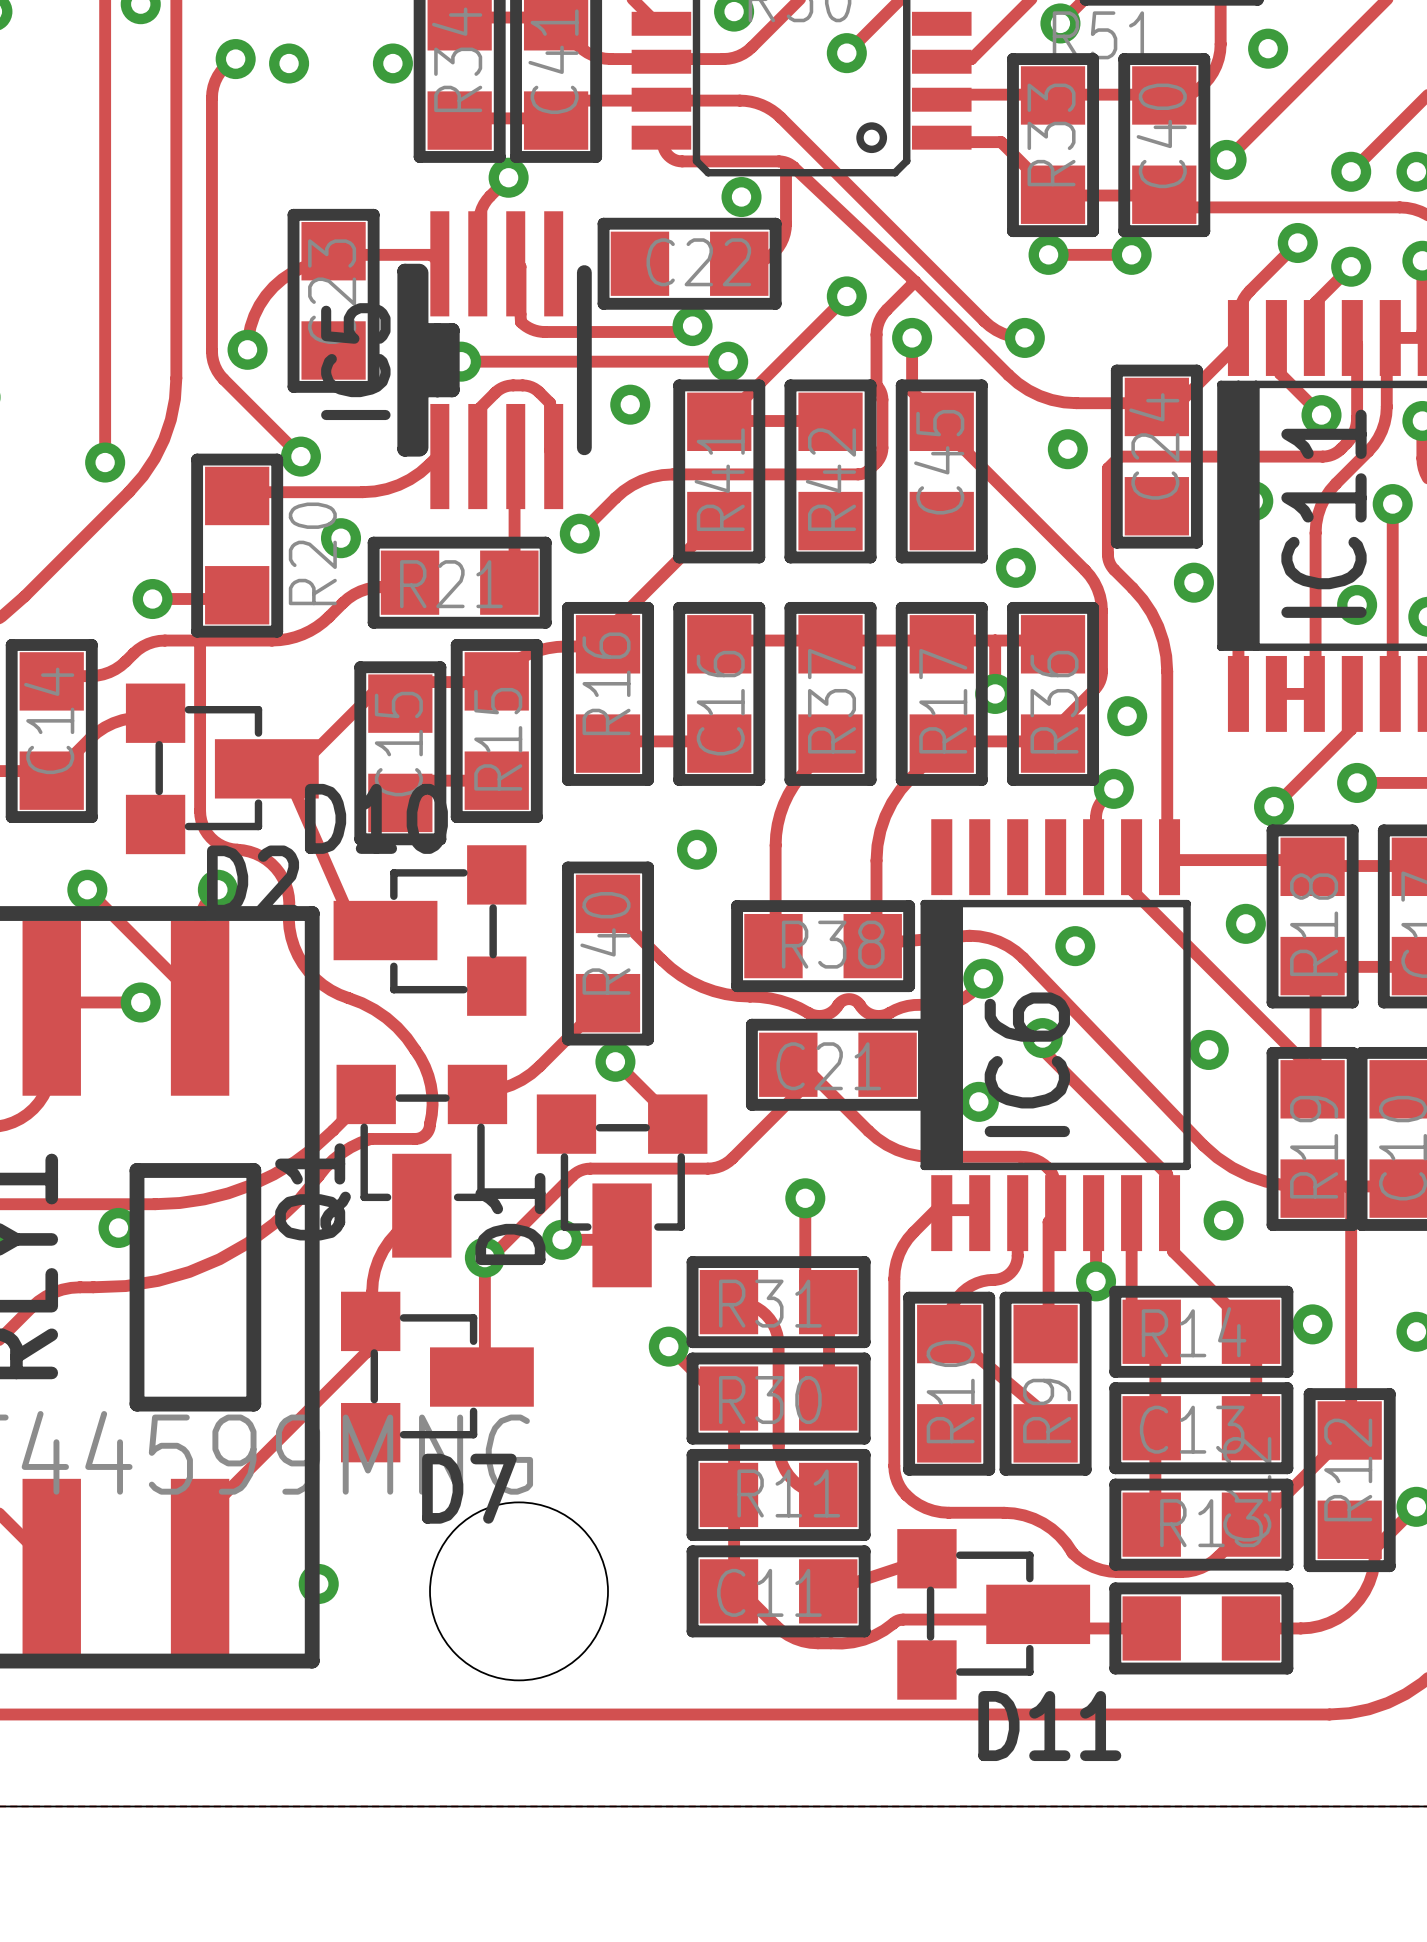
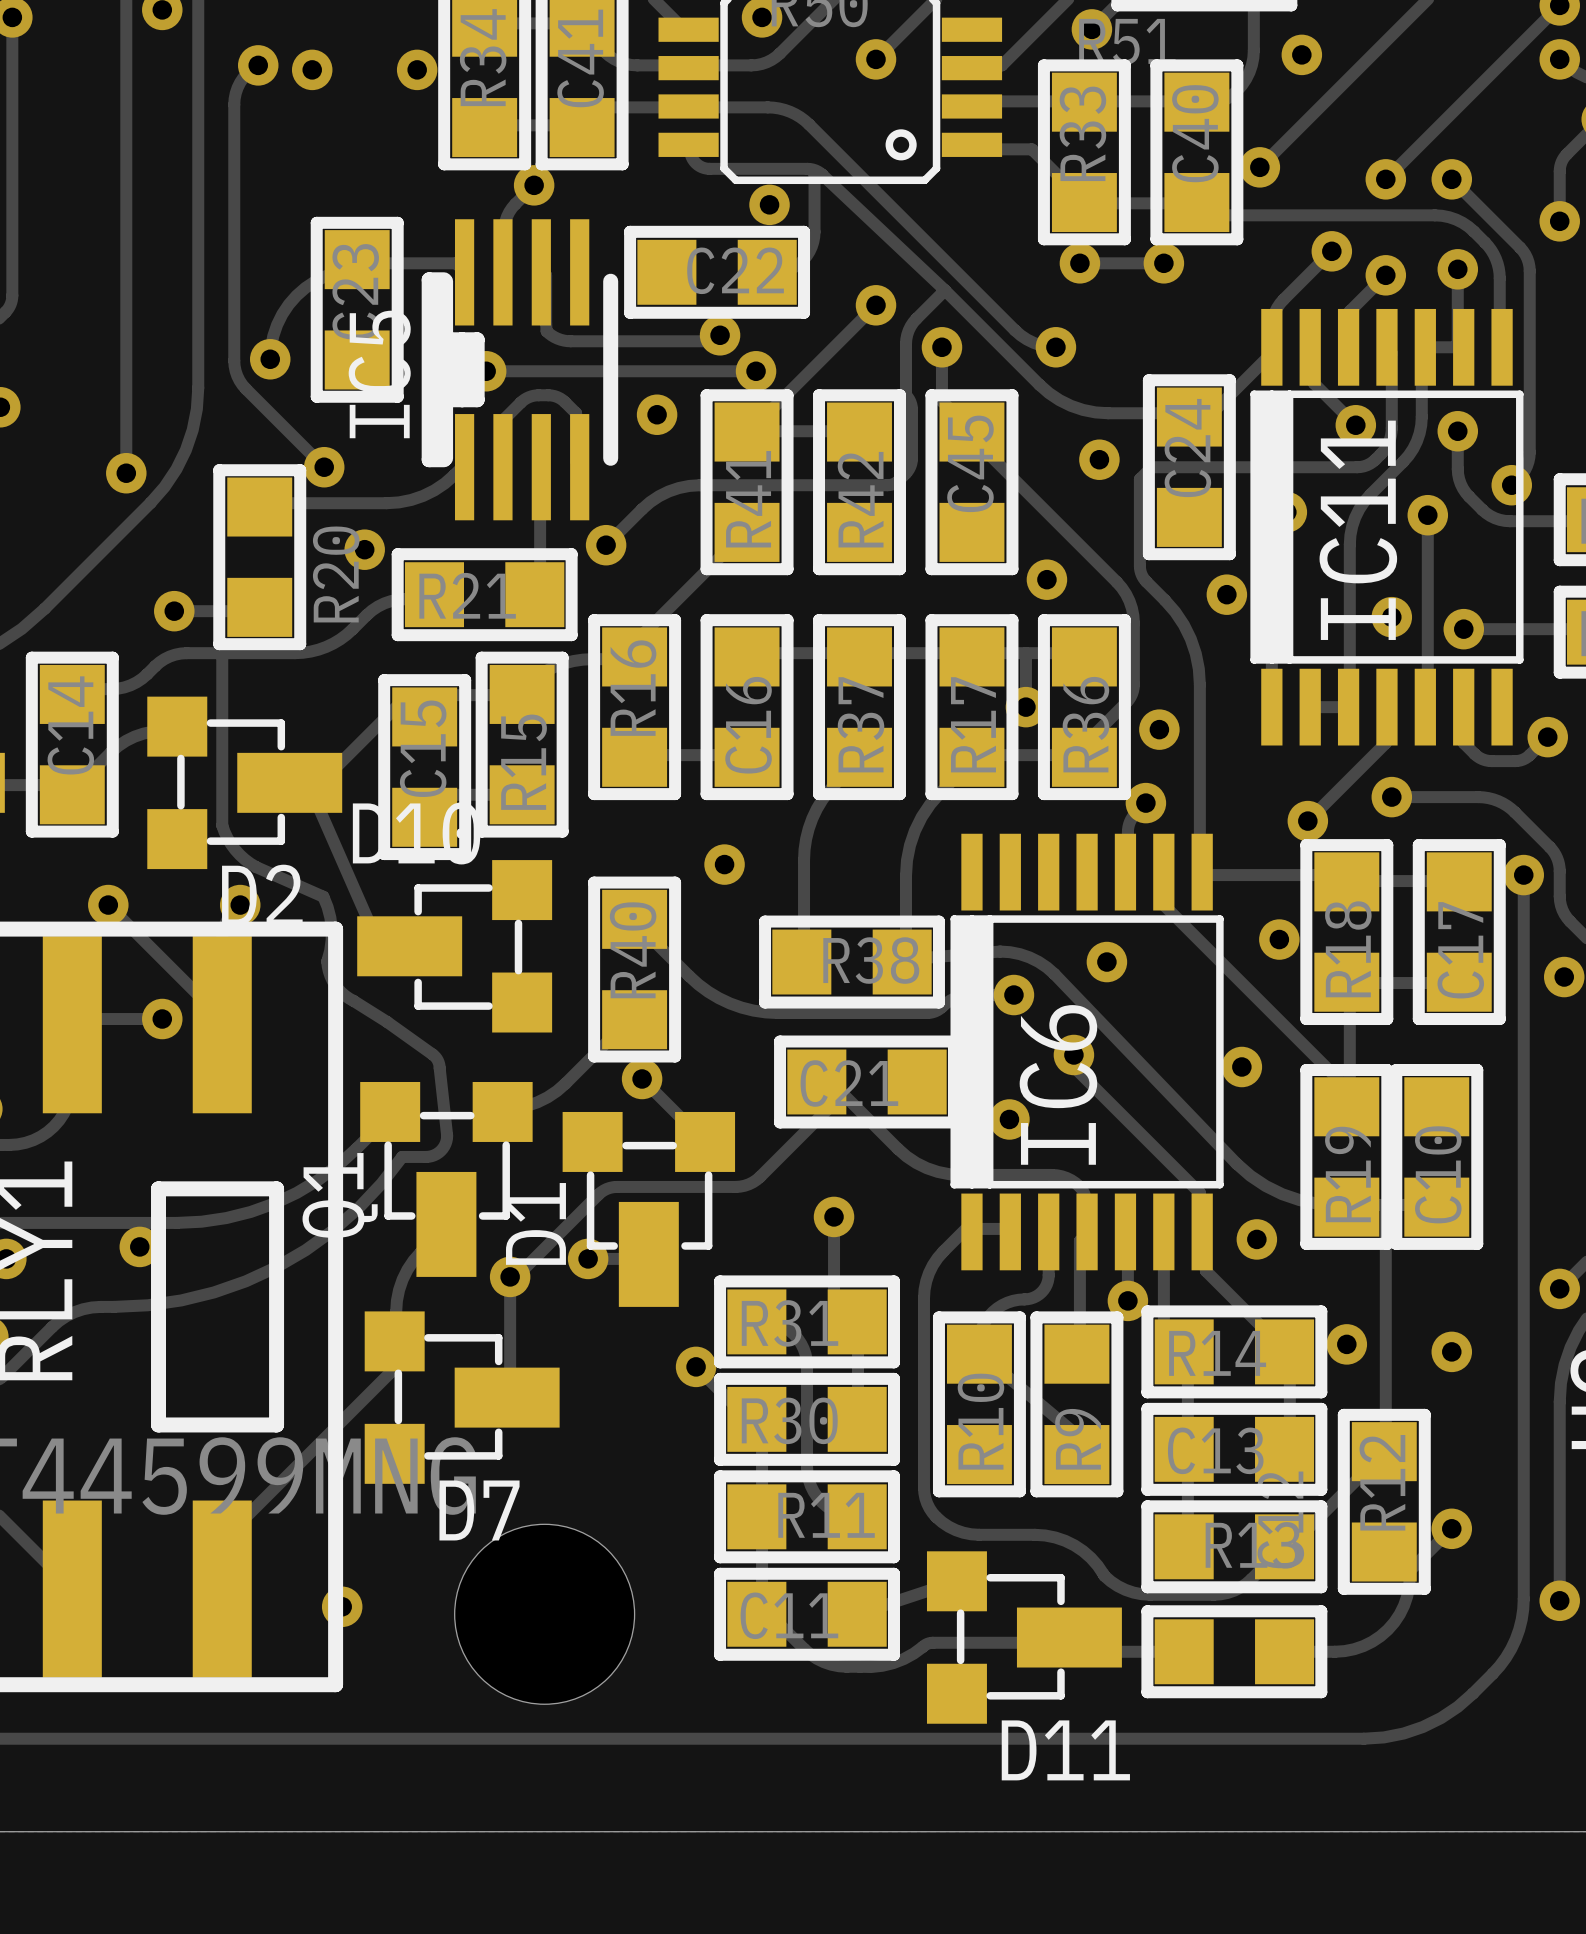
track: (200, 811) (202, 825) (214, 841) (227, 848) (249, 851) (261, 856) (279, 873) (288, 896) (291, 937) (298, 955) (308, 971) (330, 990) (361, 1003) (386, 1017) (406, 1038) (420, 1058) (428, 1075) (432, 1095) (429, 1127) (420, 1137) (401, 1138) -> (222, 825) (231, 844) (250, 863) (323, 896) (331, 928) (327, 966) (335, 984) (345, 995) (387, 1022) (436, 1058) (439, 1066) (446, 1138) (440, 1150) (434, 1155) (425, 1156)
track: (983, 978) (970, 993) (953, 1003) (940, 1005) (907, 1005) (880, 1015) (868, 1013) (856, 1001) (850, 999) (842, 1000) (831, 1012) (819, 1015) (812, 1014) (780, 1000) (749, 996) -> (1013, 995) (960, 996) (929, 1012) (778, 1013)
track: (378, 1138) (370, 1138) (360, 1142) (341, 1153) (325, 1167) (297, 1201) (274, 1223) (247, 1243) (219, 1259) (189, 1271) (158, 1280) (125, 1286) (93, 1287) -> (402, 1156) (381, 1183) (358, 1208) (333, 1230) (305, 1250) (276, 1267) (245, 1281) (214, 1292) (181, 1300) (147, 1305) (114, 1306)

